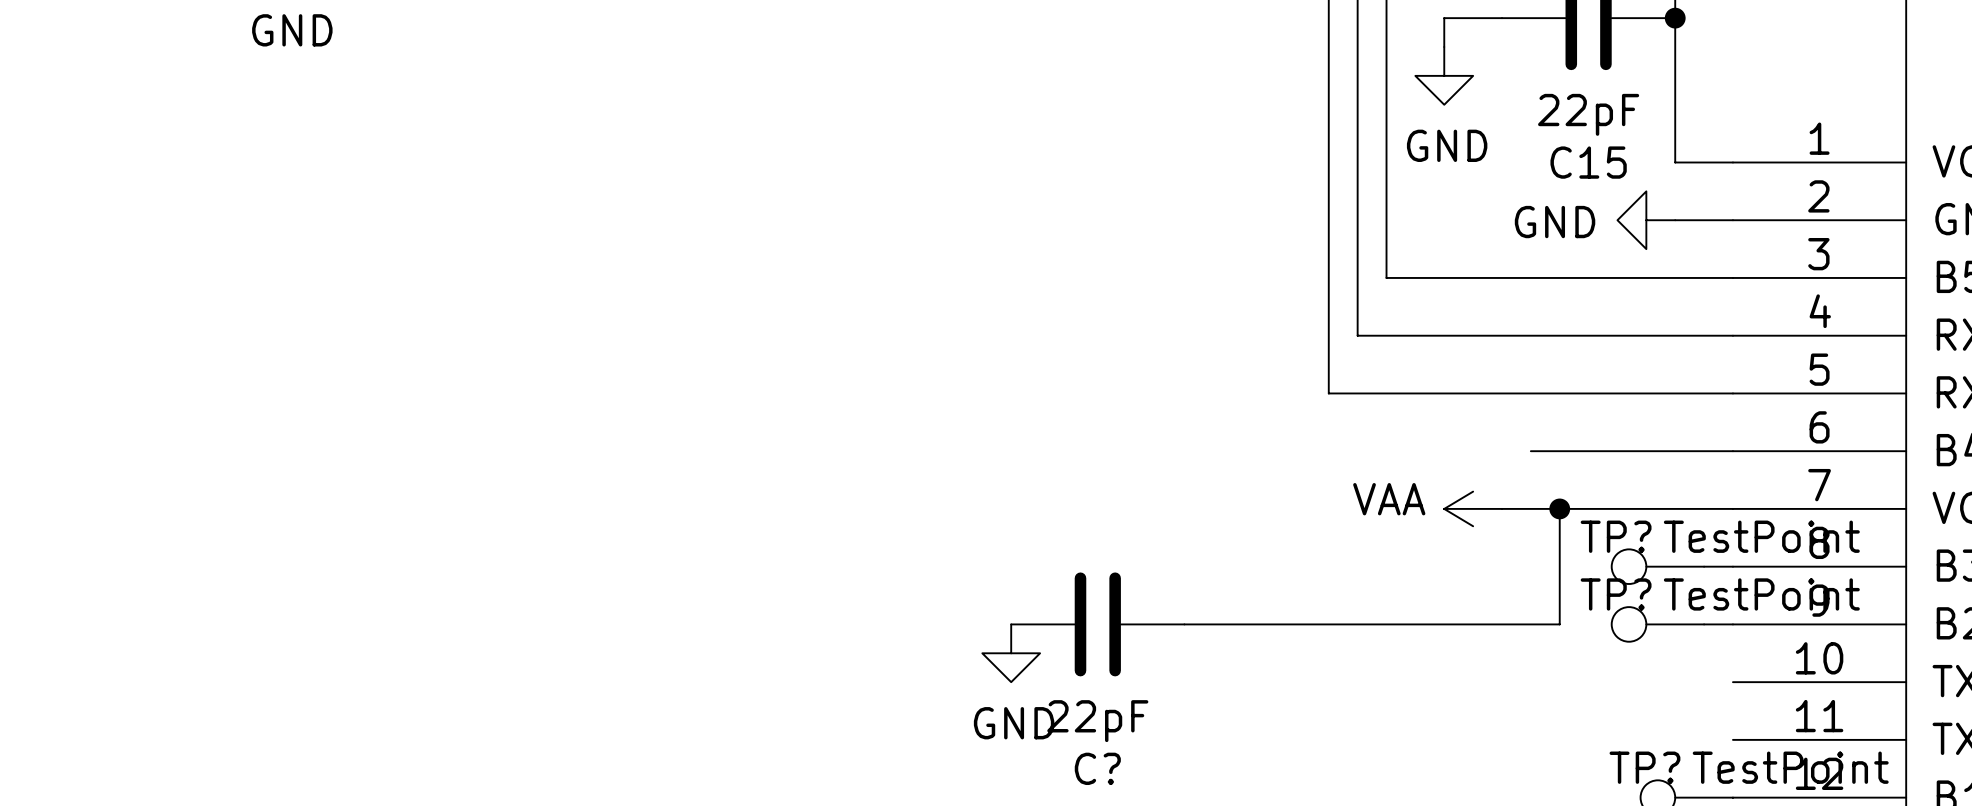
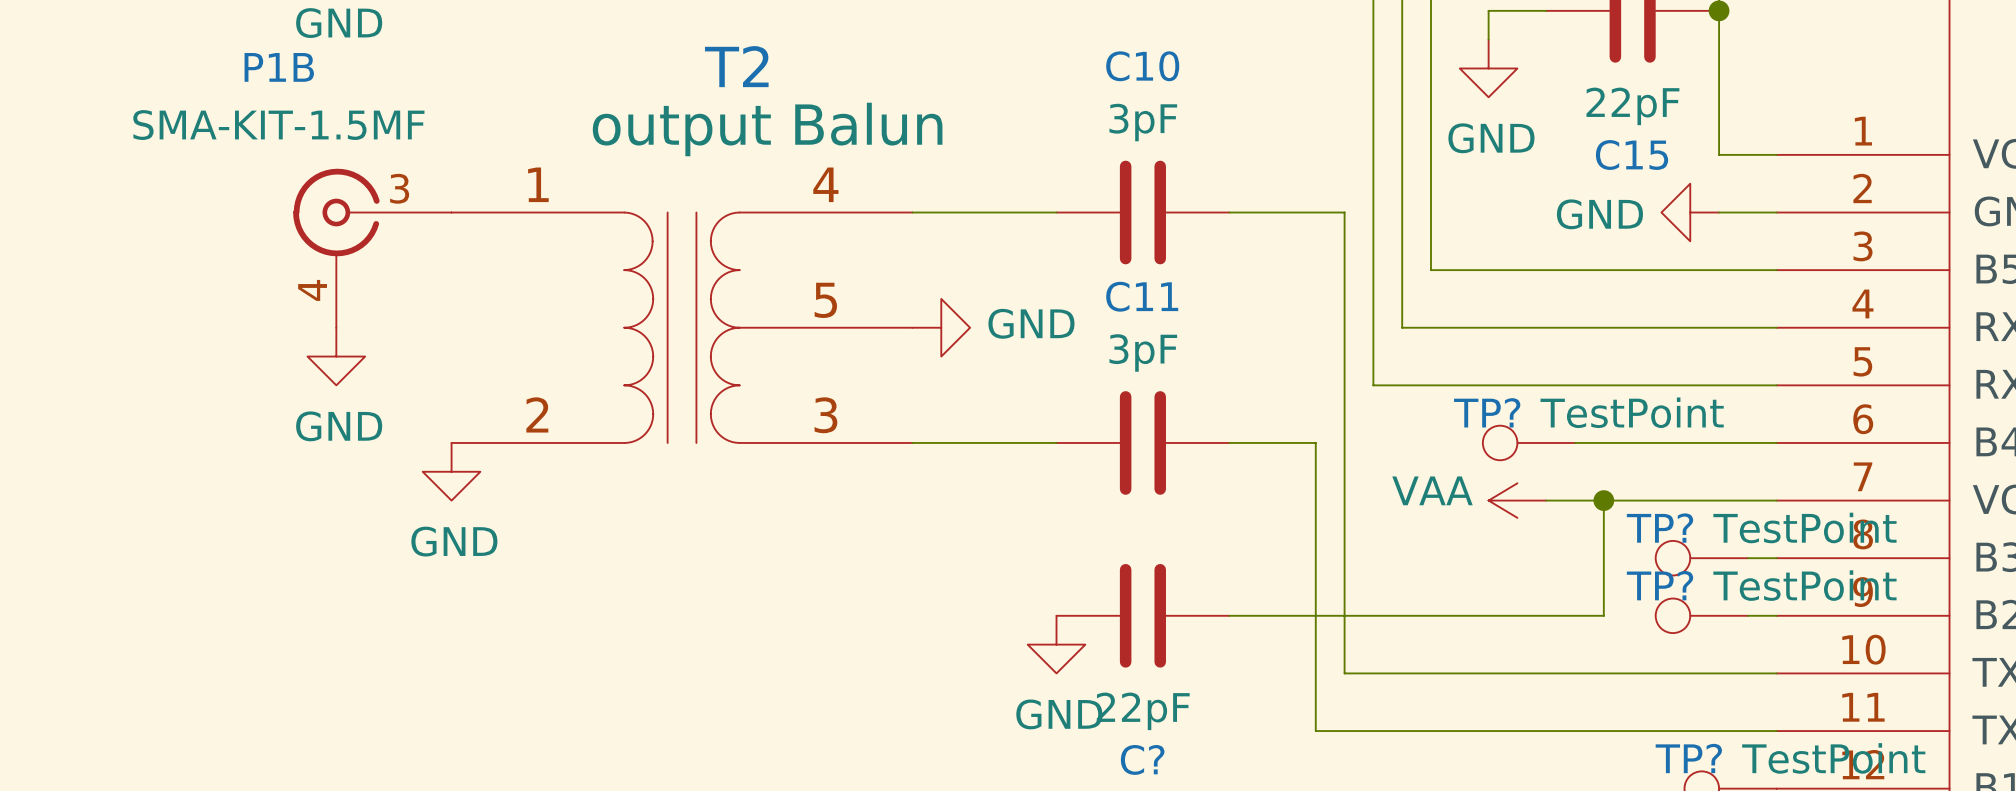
wire: none -> (912, 212) (1056, 212)
C10: none -> 3pF (1142, 212)
wire: none -> (1229, 212) (1344, 212) (1344, 673) (1776, 673)
P1B: none -> SMA-KIT-1.5MF (372, 248)
T2: none -> output Balun (682, 327)
power symbol: none -> GND (941, 327)
power symbol: none -> GND (336, 356)
wire: none -> (912, 442) (1056, 442)
C11: none -> 3pF (1142, 442)
wire: none -> (1229, 442) (1315, 442) (1315, 731) (1776, 731)
TP?: none -> TestPoint (1528, 442)
power symbol: none -> GND (451, 471)

